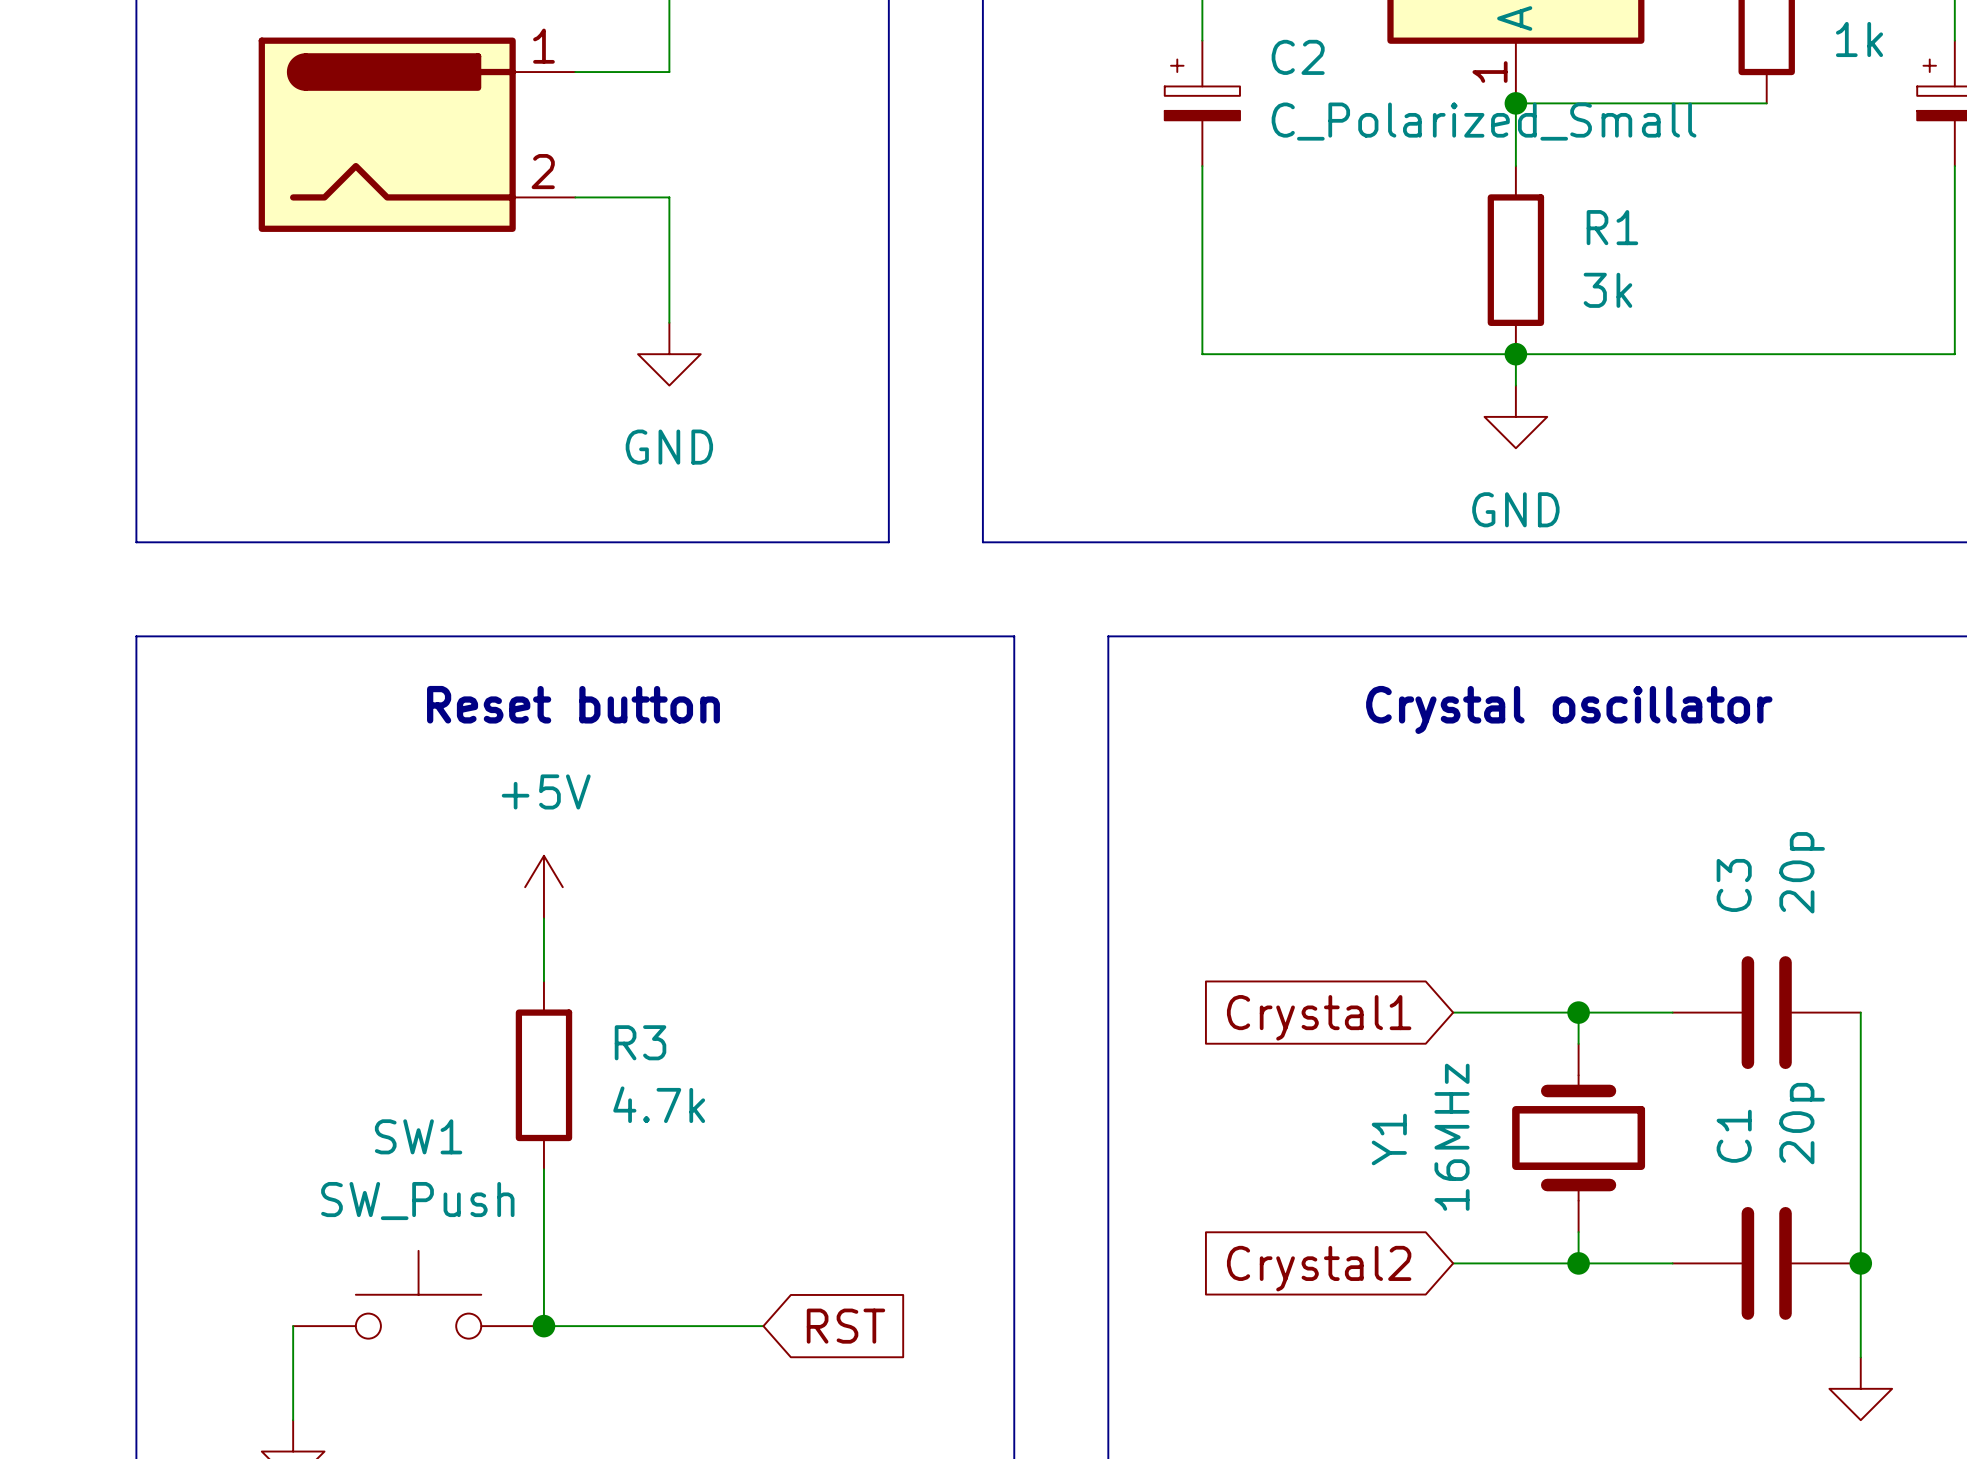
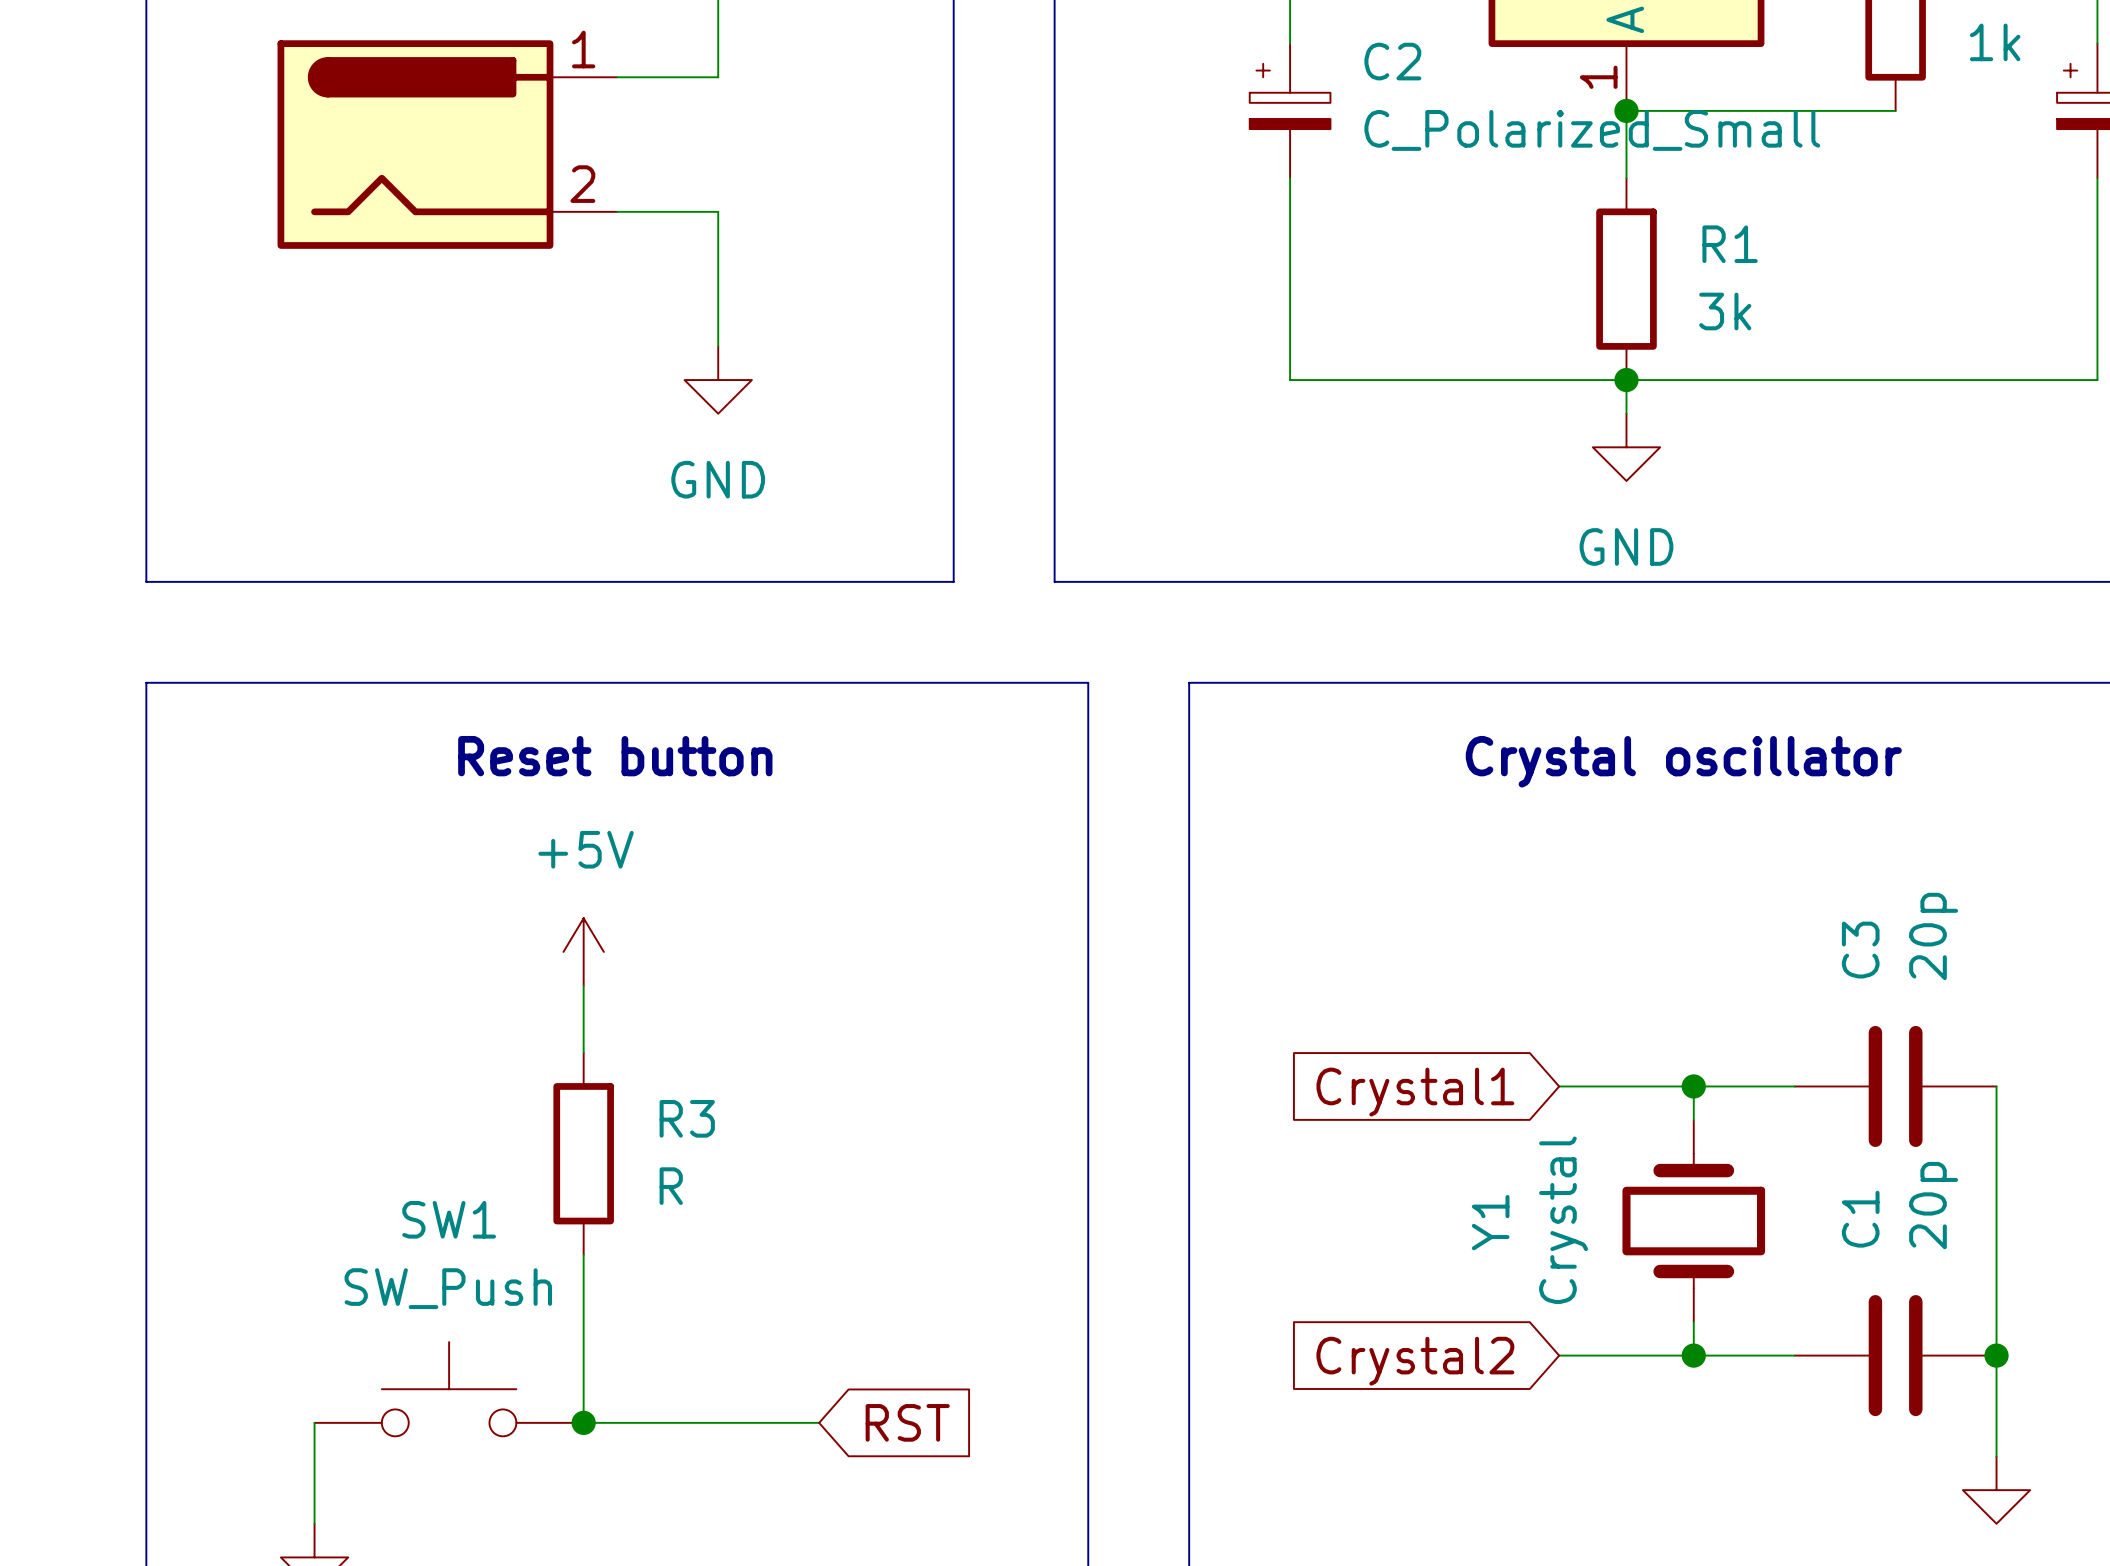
R3 value: 4.7k (659, 1104) -> R (671, 1186)
Y1 value: 16MHz (1452, 1137) -> Crystal (1563, 1220)

